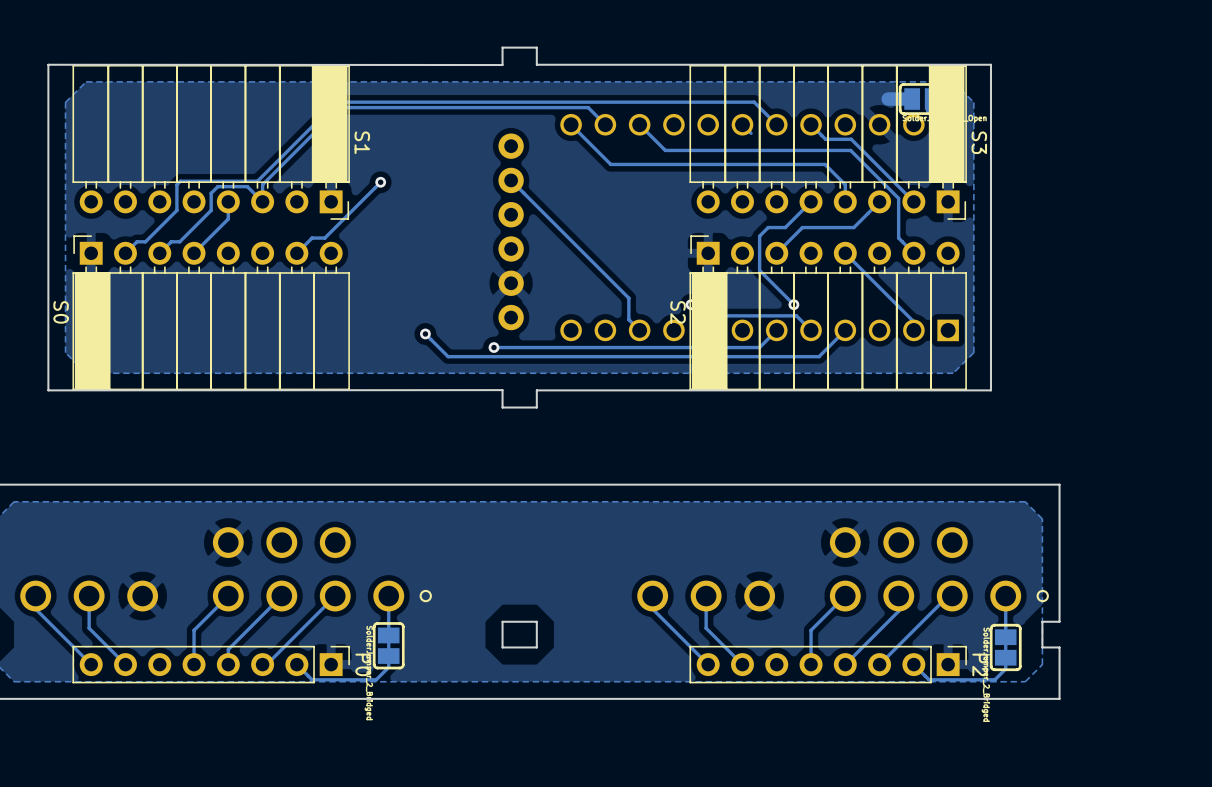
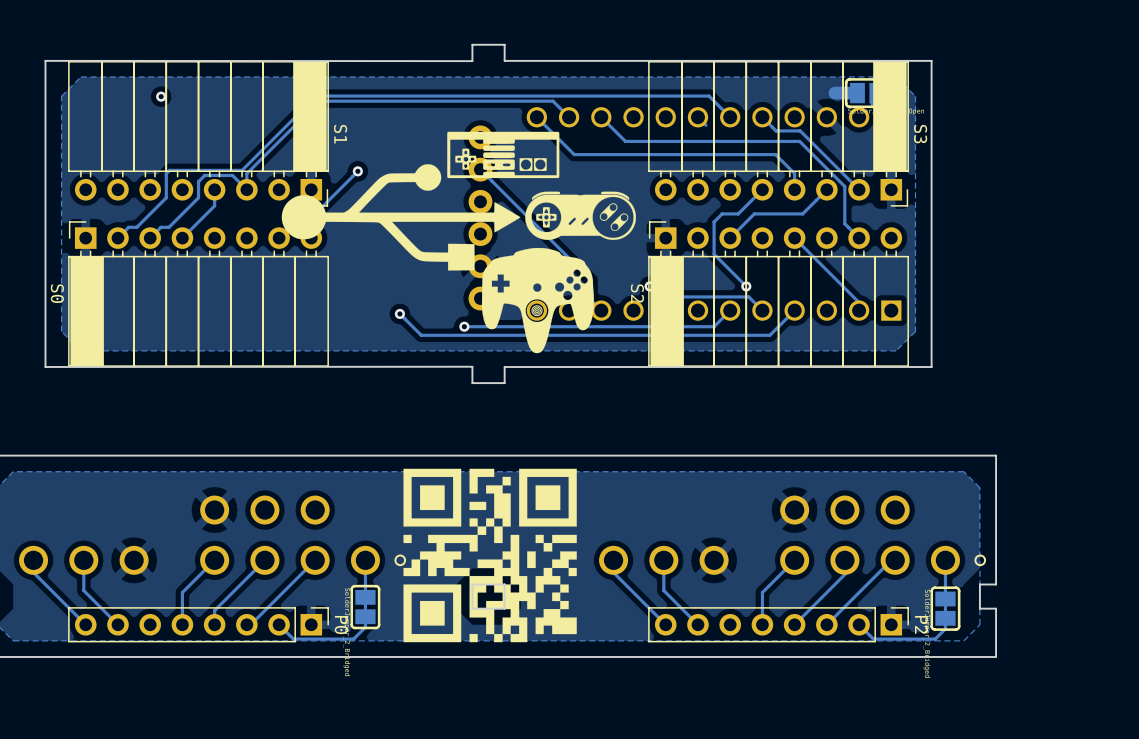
via: none -> (161, 96)
drawing: none -> [281, 131, 636, 354]
drawing: none -> [403, 468, 577, 643]

